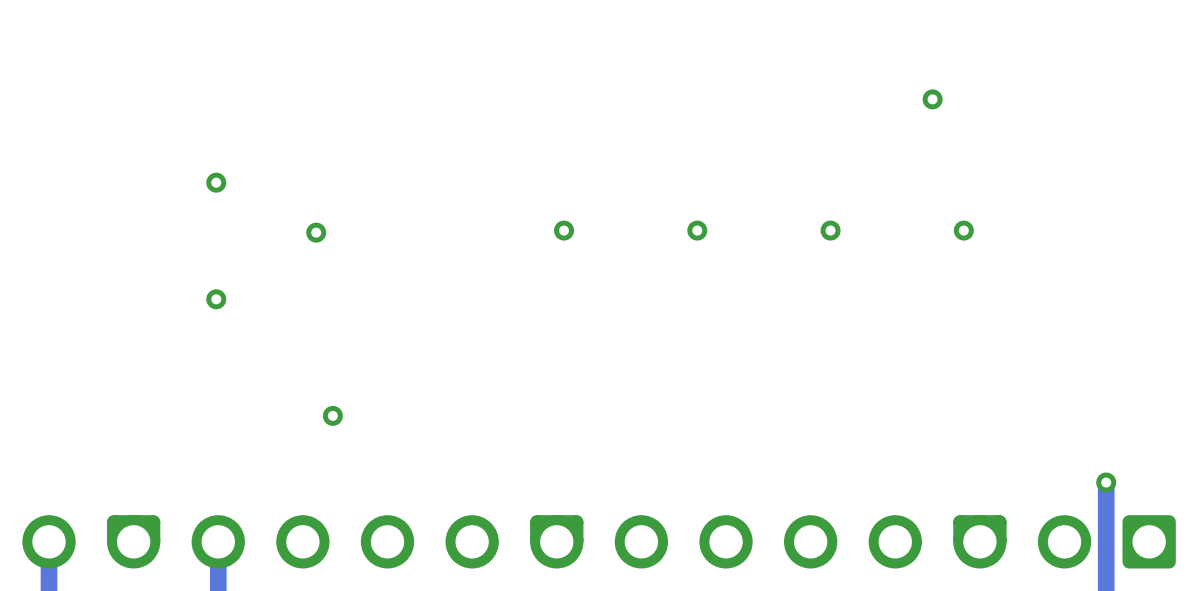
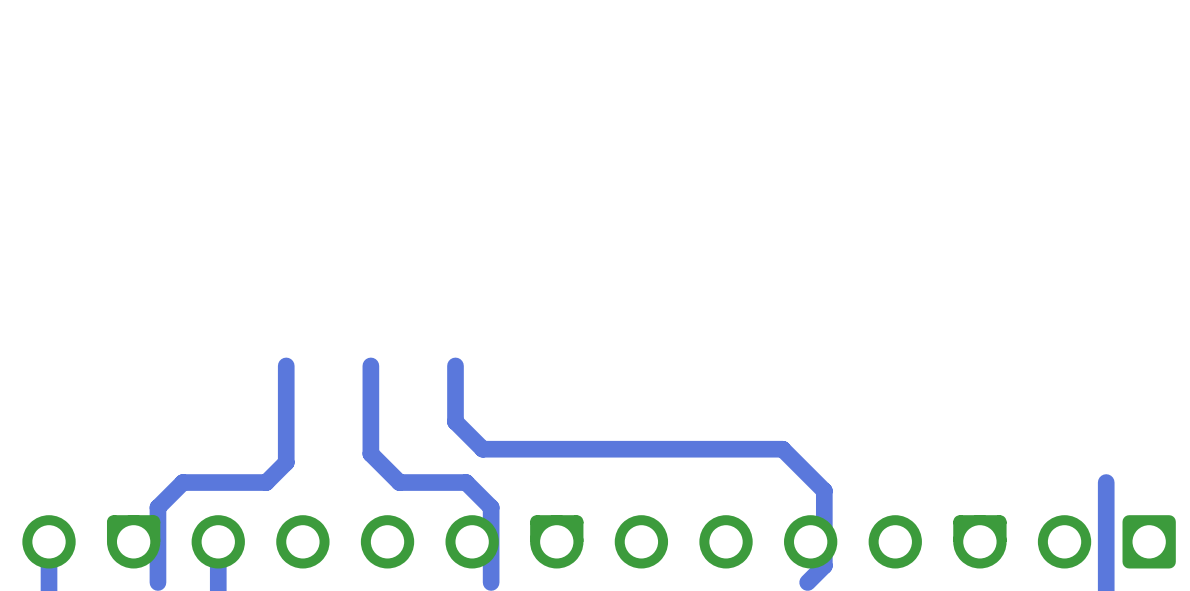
via: (932, 99) -> none
via: (216, 182) -> none
via: (564, 230) -> none
via: (697, 230) -> none
via: (830, 230) -> none
via: (963, 230) -> none
via: (316, 232) -> none
via: (216, 299) -> none
track: none -> (286, 365) (286, 462) (266, 482) (182, 482) (157, 507) (157, 582)
track: none -> (370, 365) (370, 453) (399, 482) (466, 482) (491, 507) (491, 582)
track: none -> (455, 365) (455, 421) (482, 449) (782, 449) (824, 490) (824, 565) (807, 582)
via: (332, 415) -> none
via: (1106, 482) -> none

